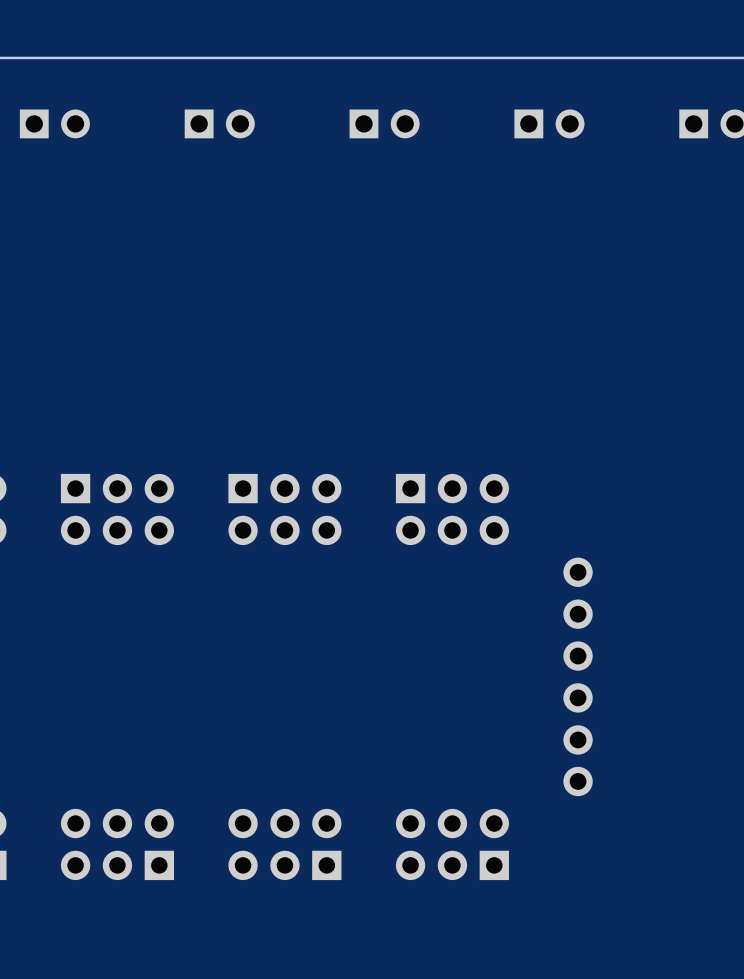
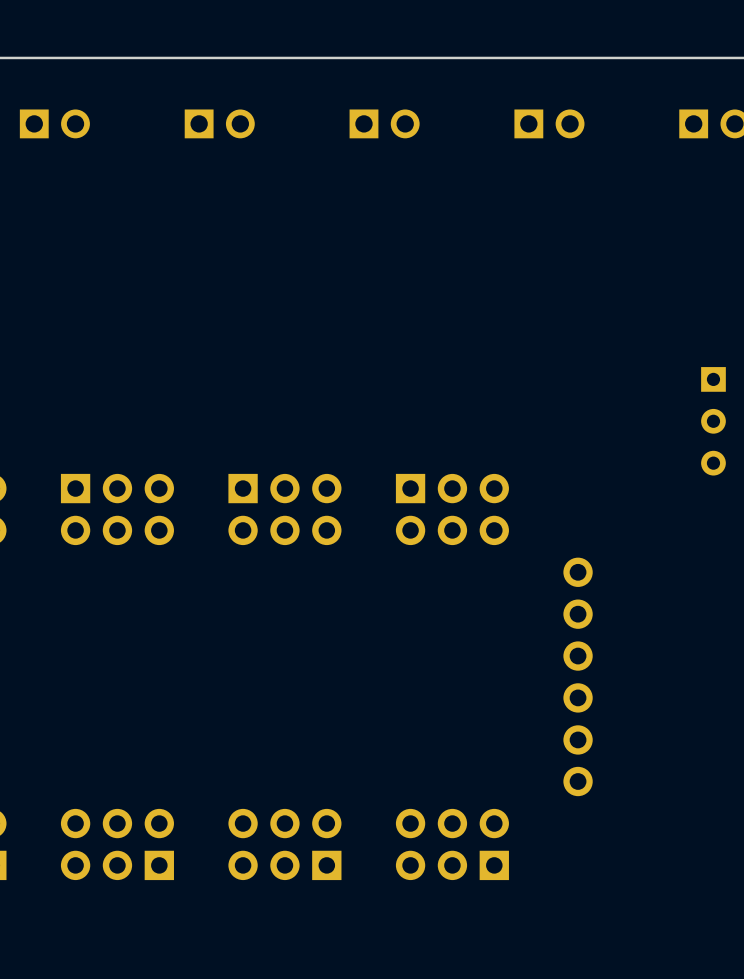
part: none -> (713, 421)

